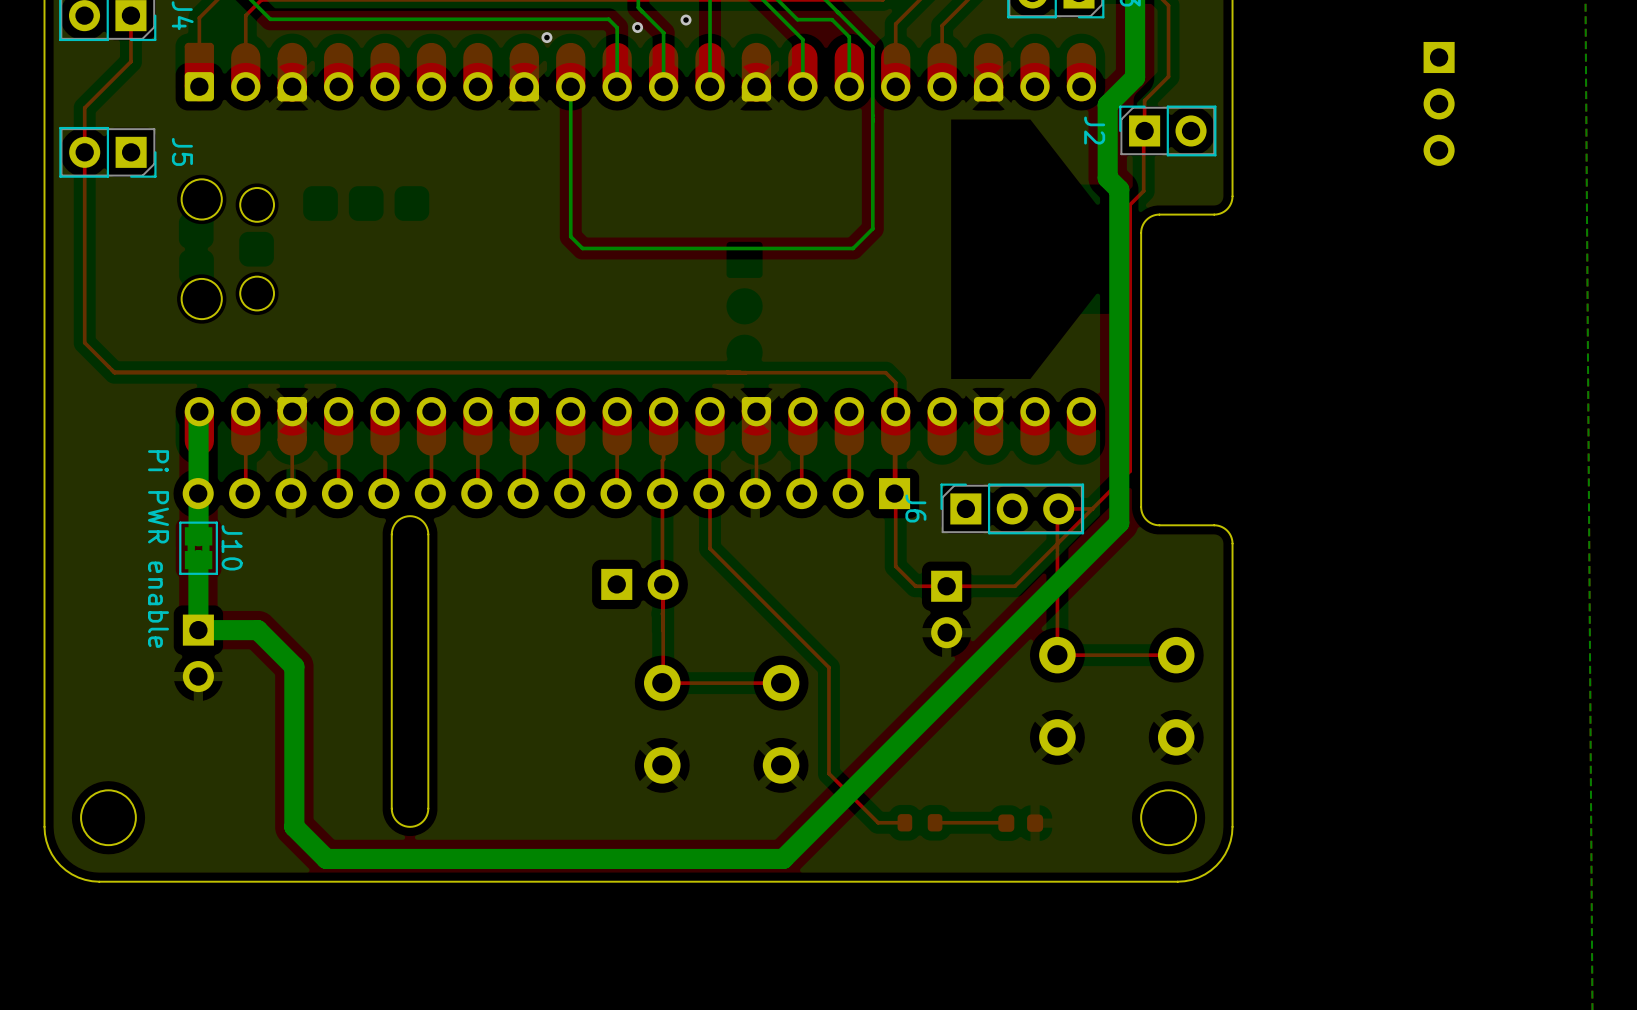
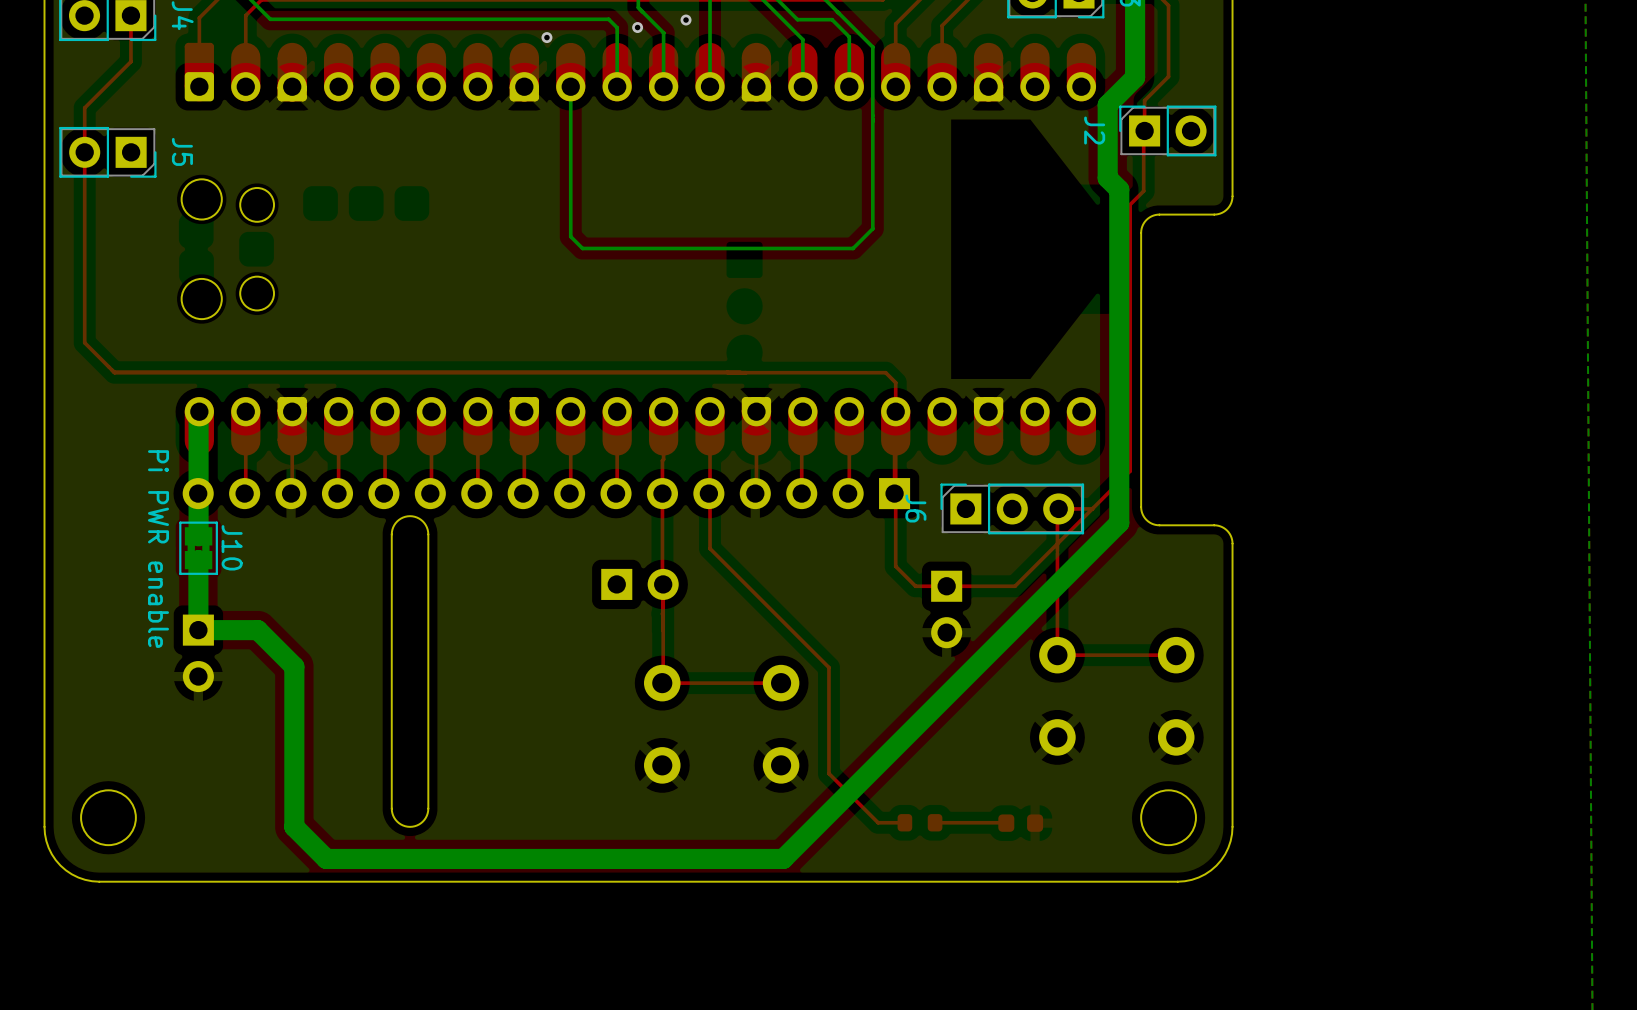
part: (1439, 103) -> none

